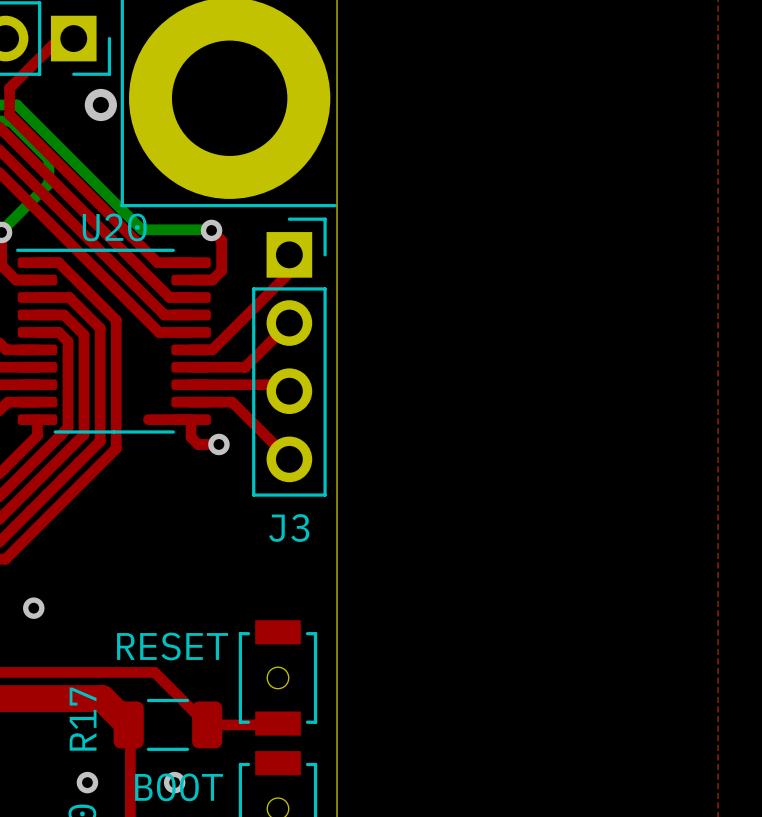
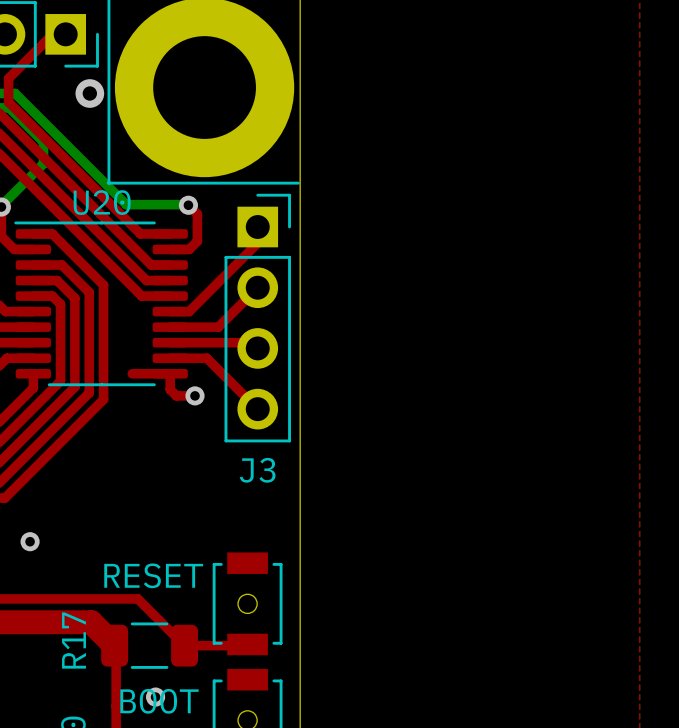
via: (87, 782) -> none

